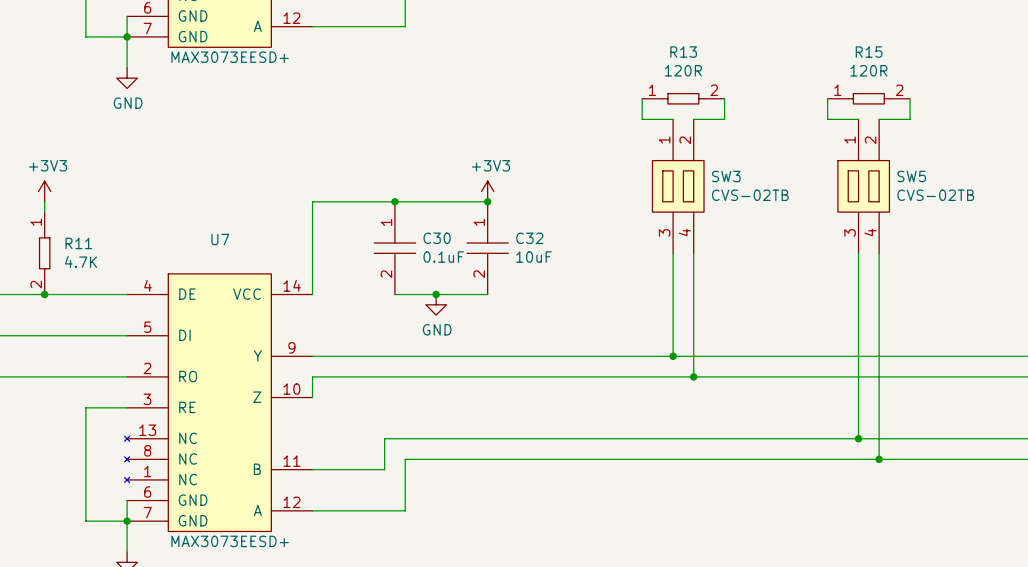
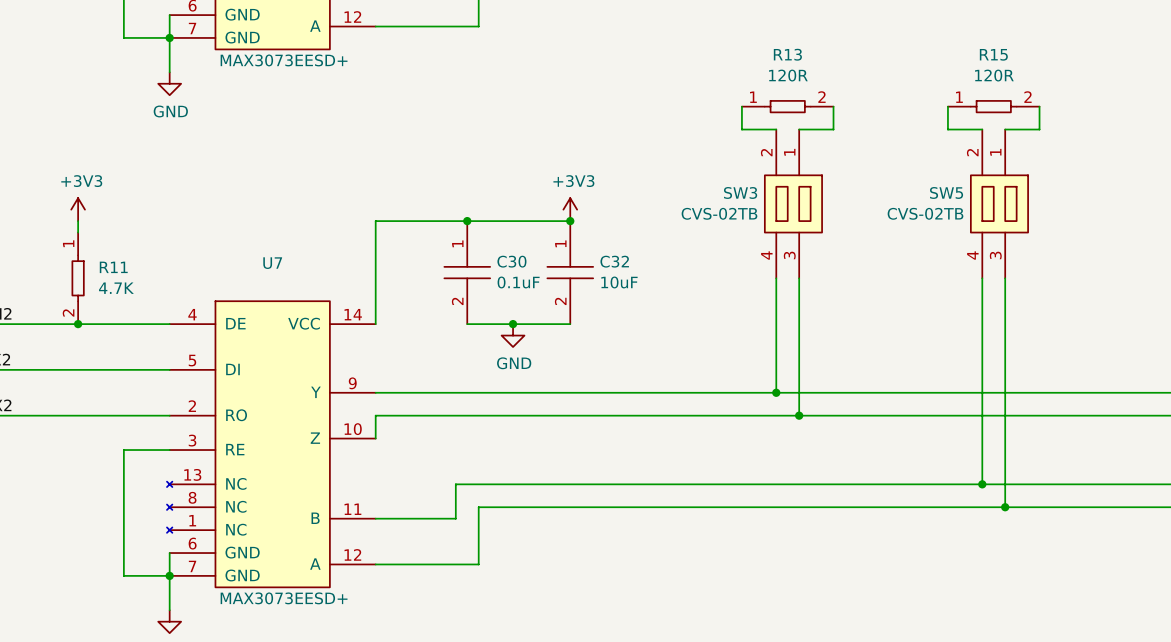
SW3 flip: as is (678, 186) -> left-right (793, 203)
SW5 flip: as is (863, 186) -> left-right (999, 203)

